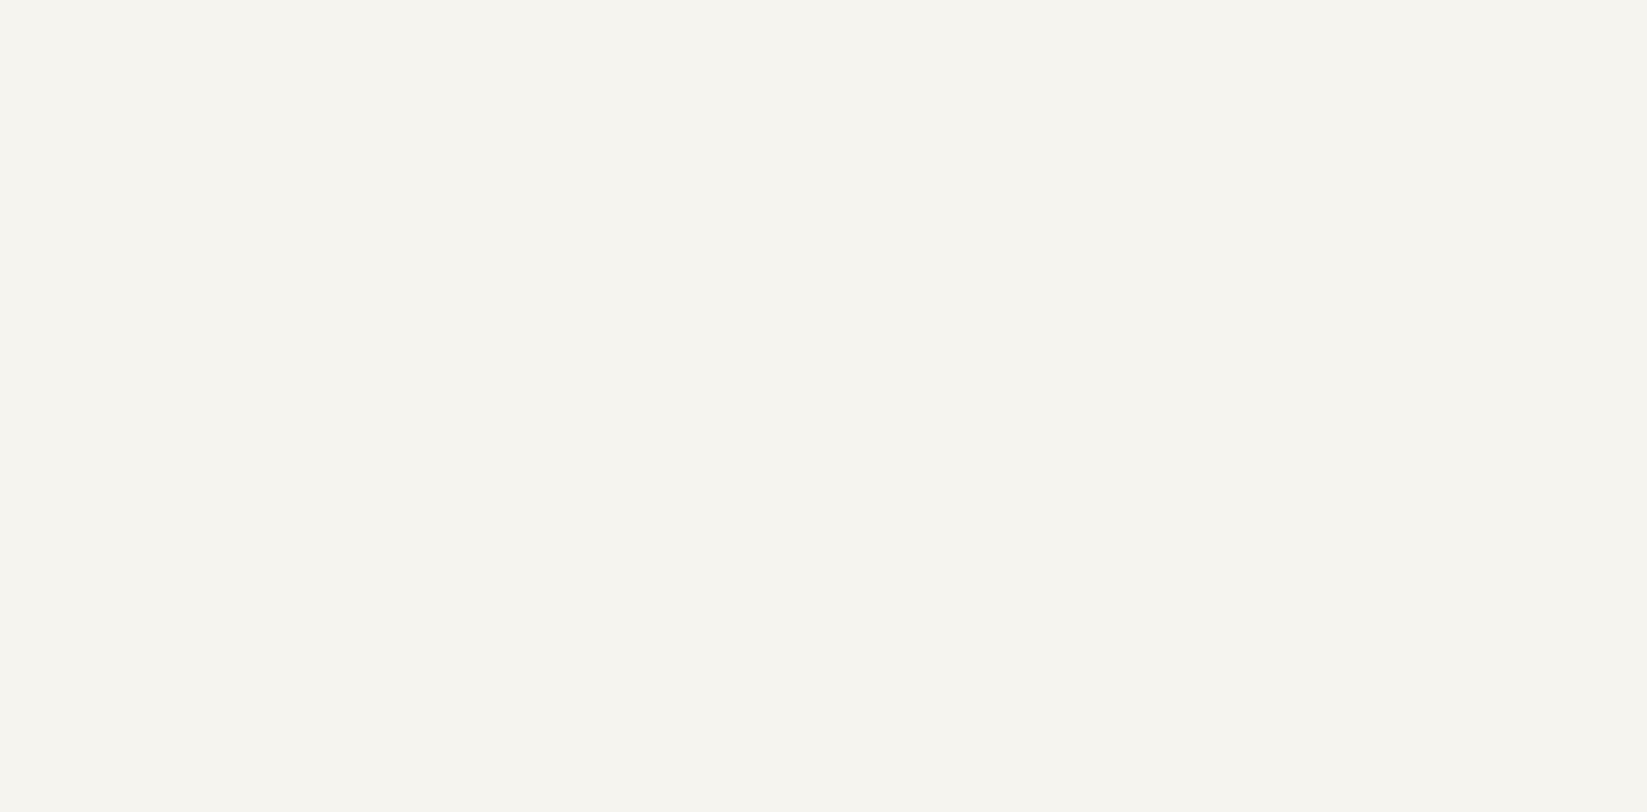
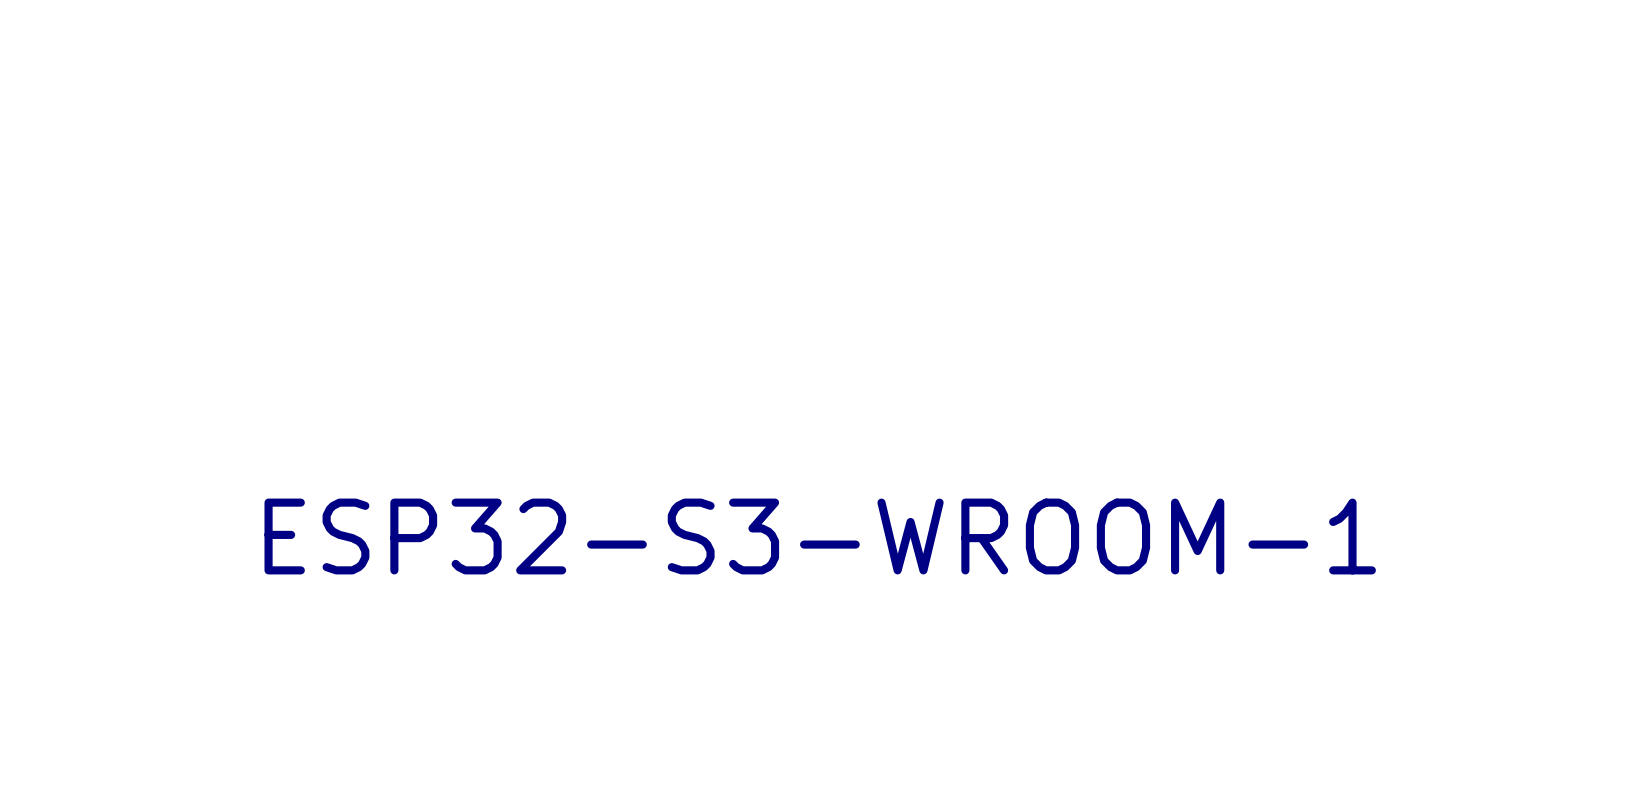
text: none -> ESP32-S3-WROOM-1 (820, 536)

